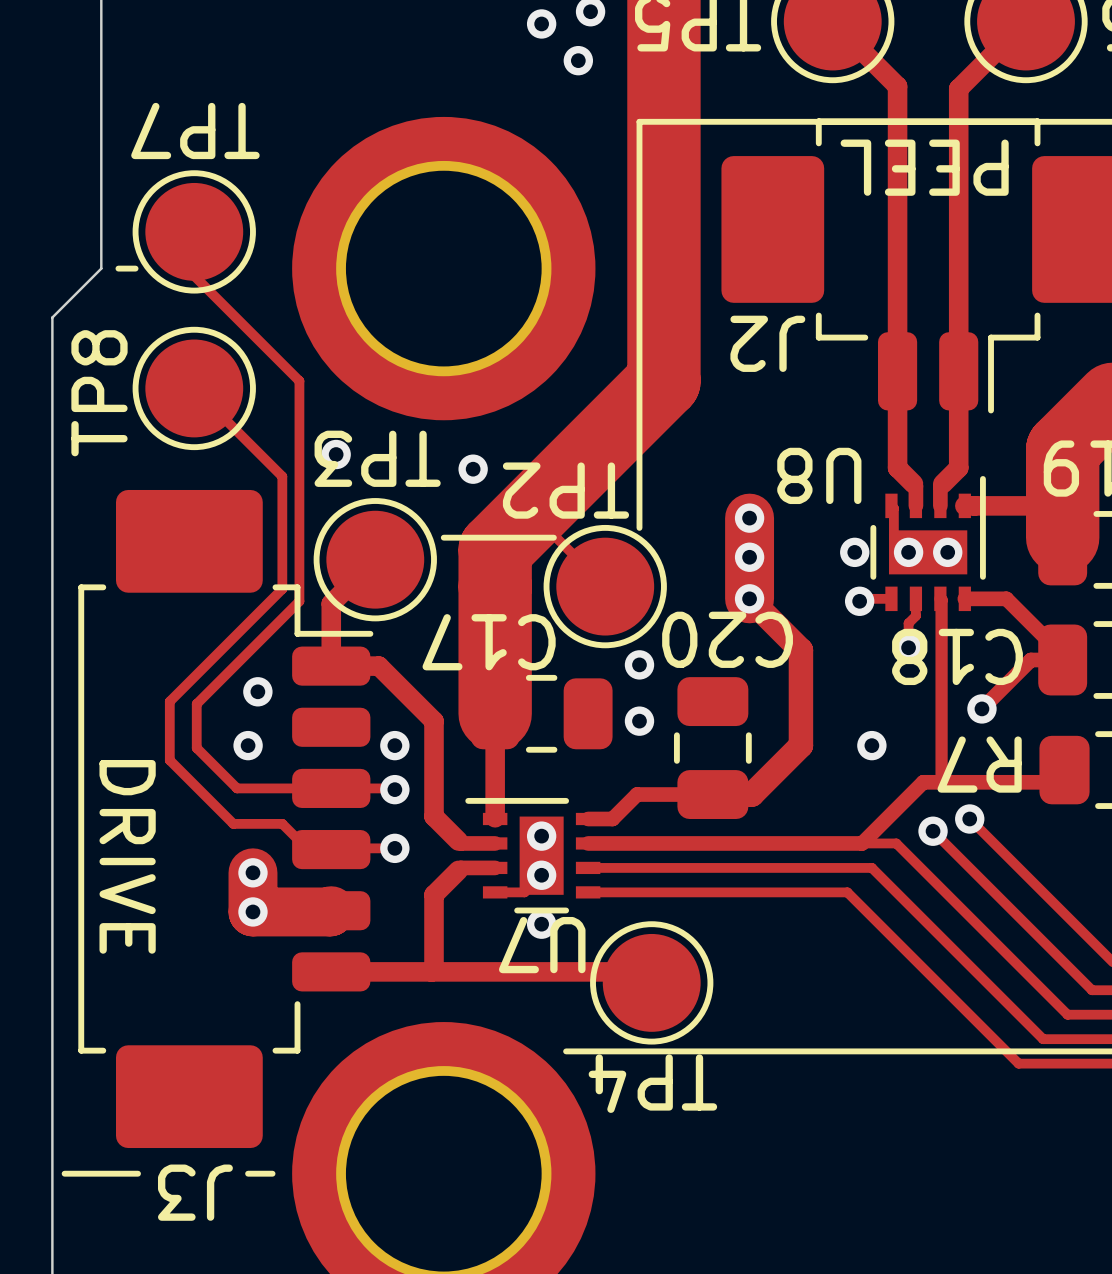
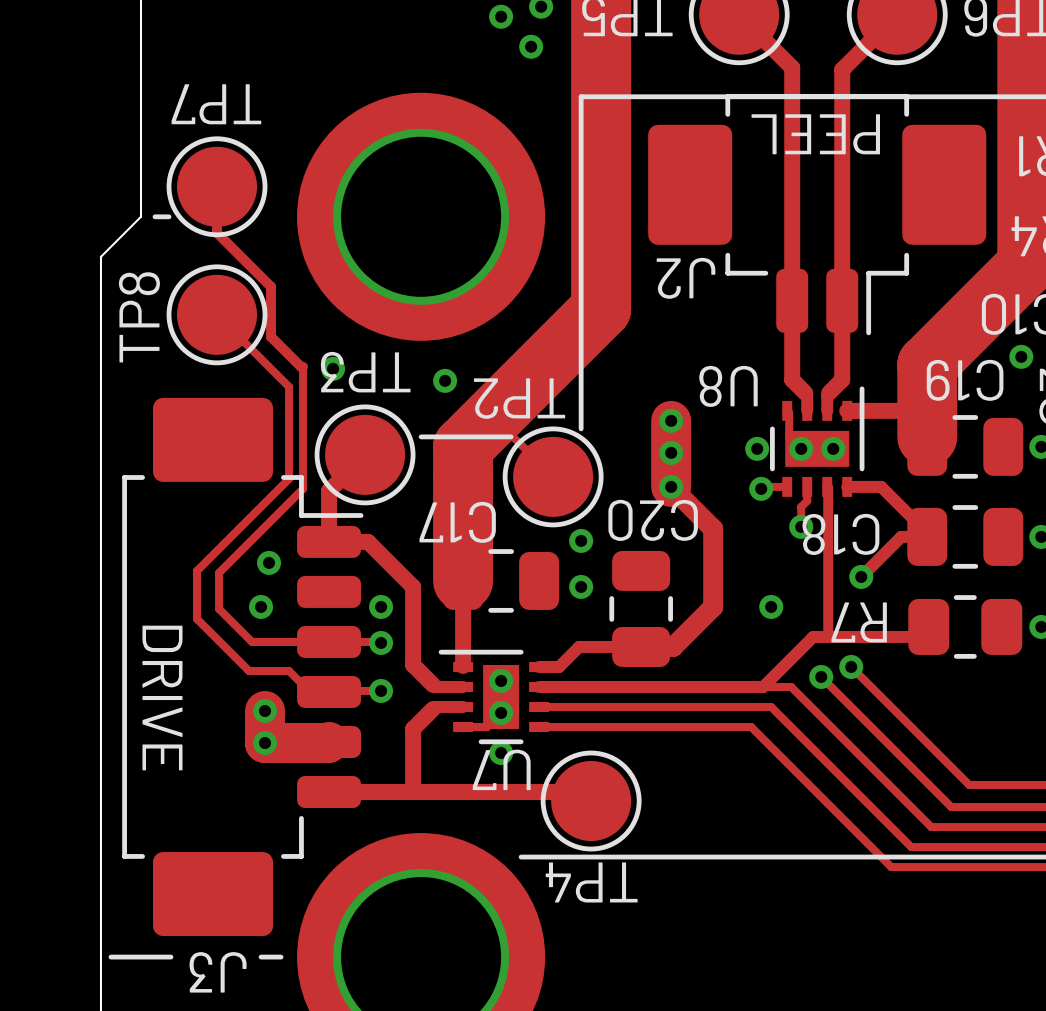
track: (194, 275) (299, 381) (299, 452) -> (217, 222) (217, 232) (271, 286) (271, 336) (303, 366)

